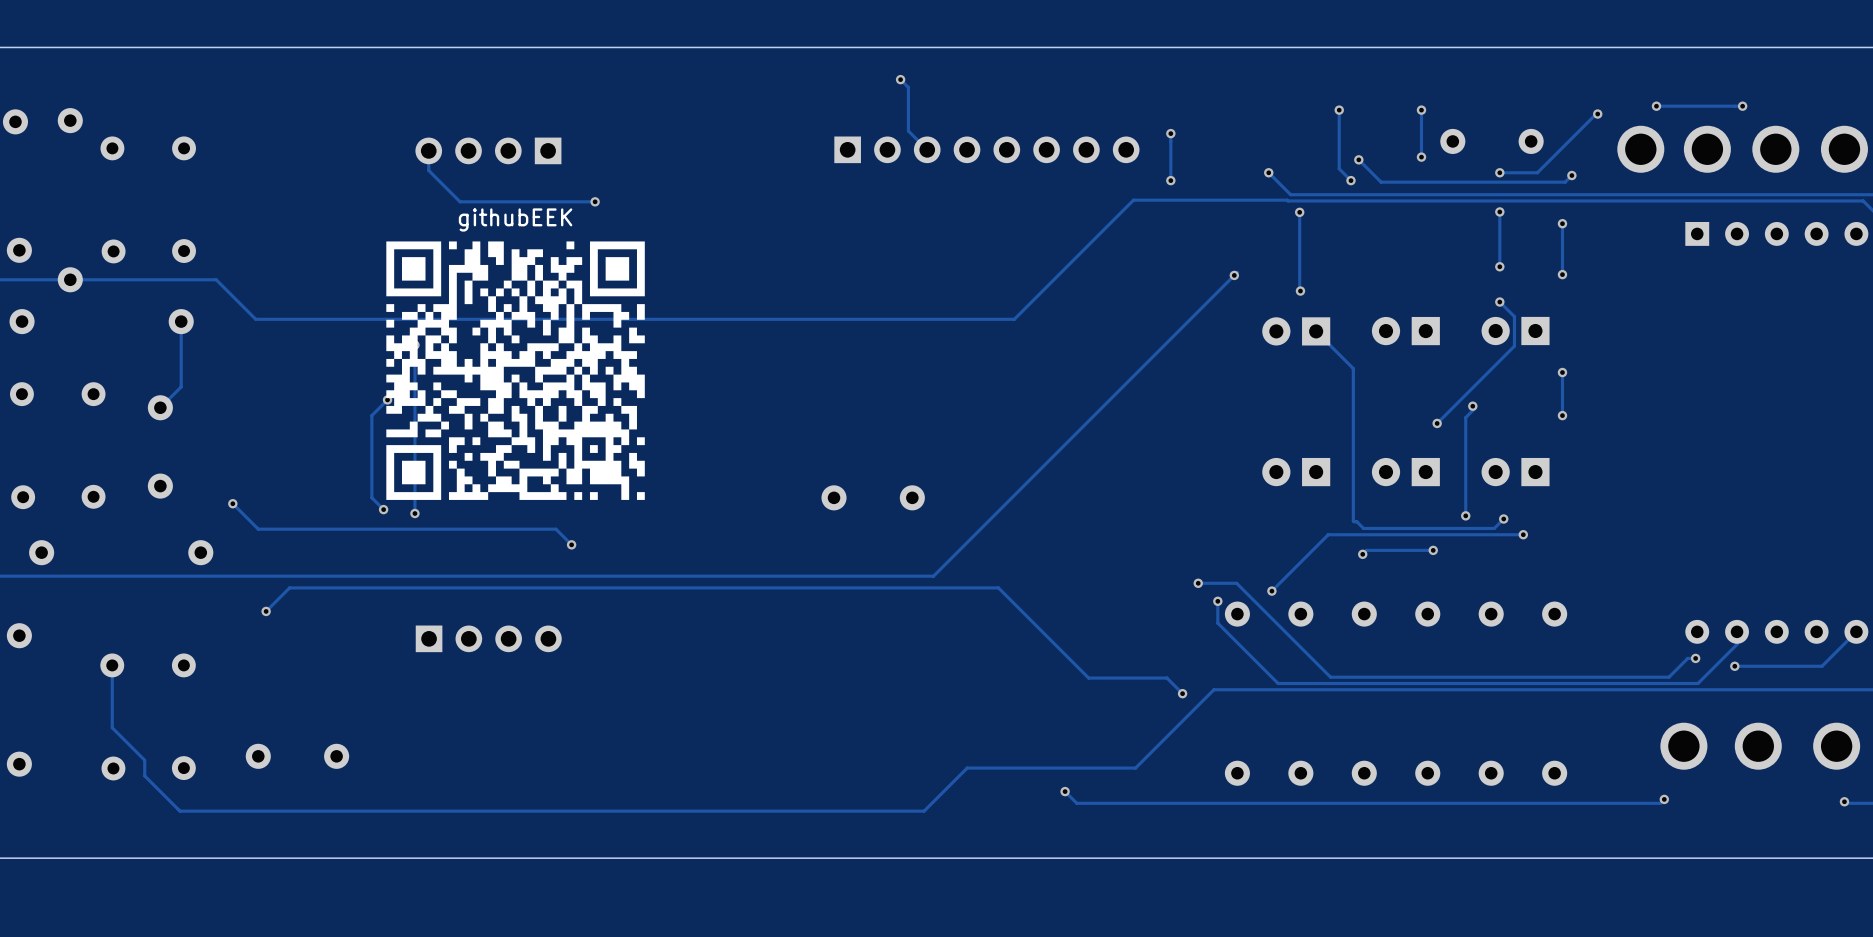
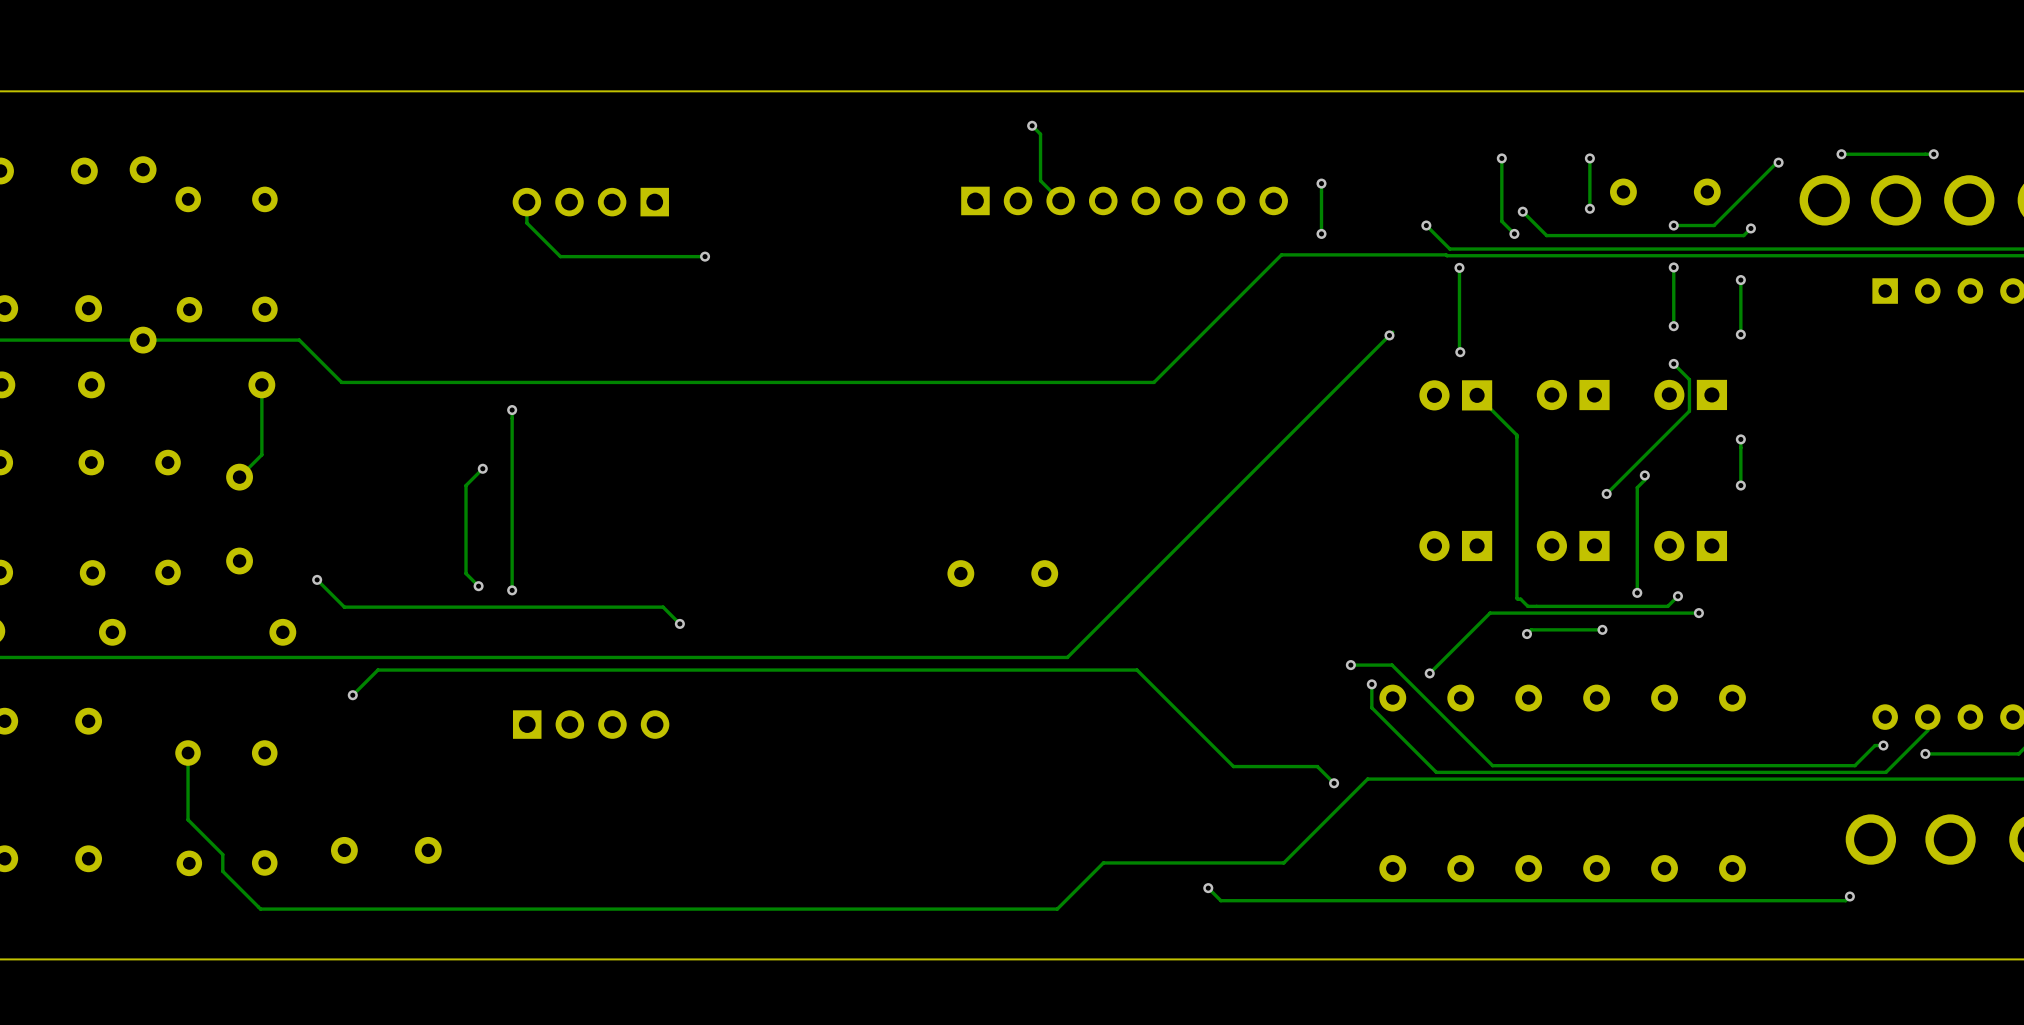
drawing: [386, 241, 645, 500] -> none

